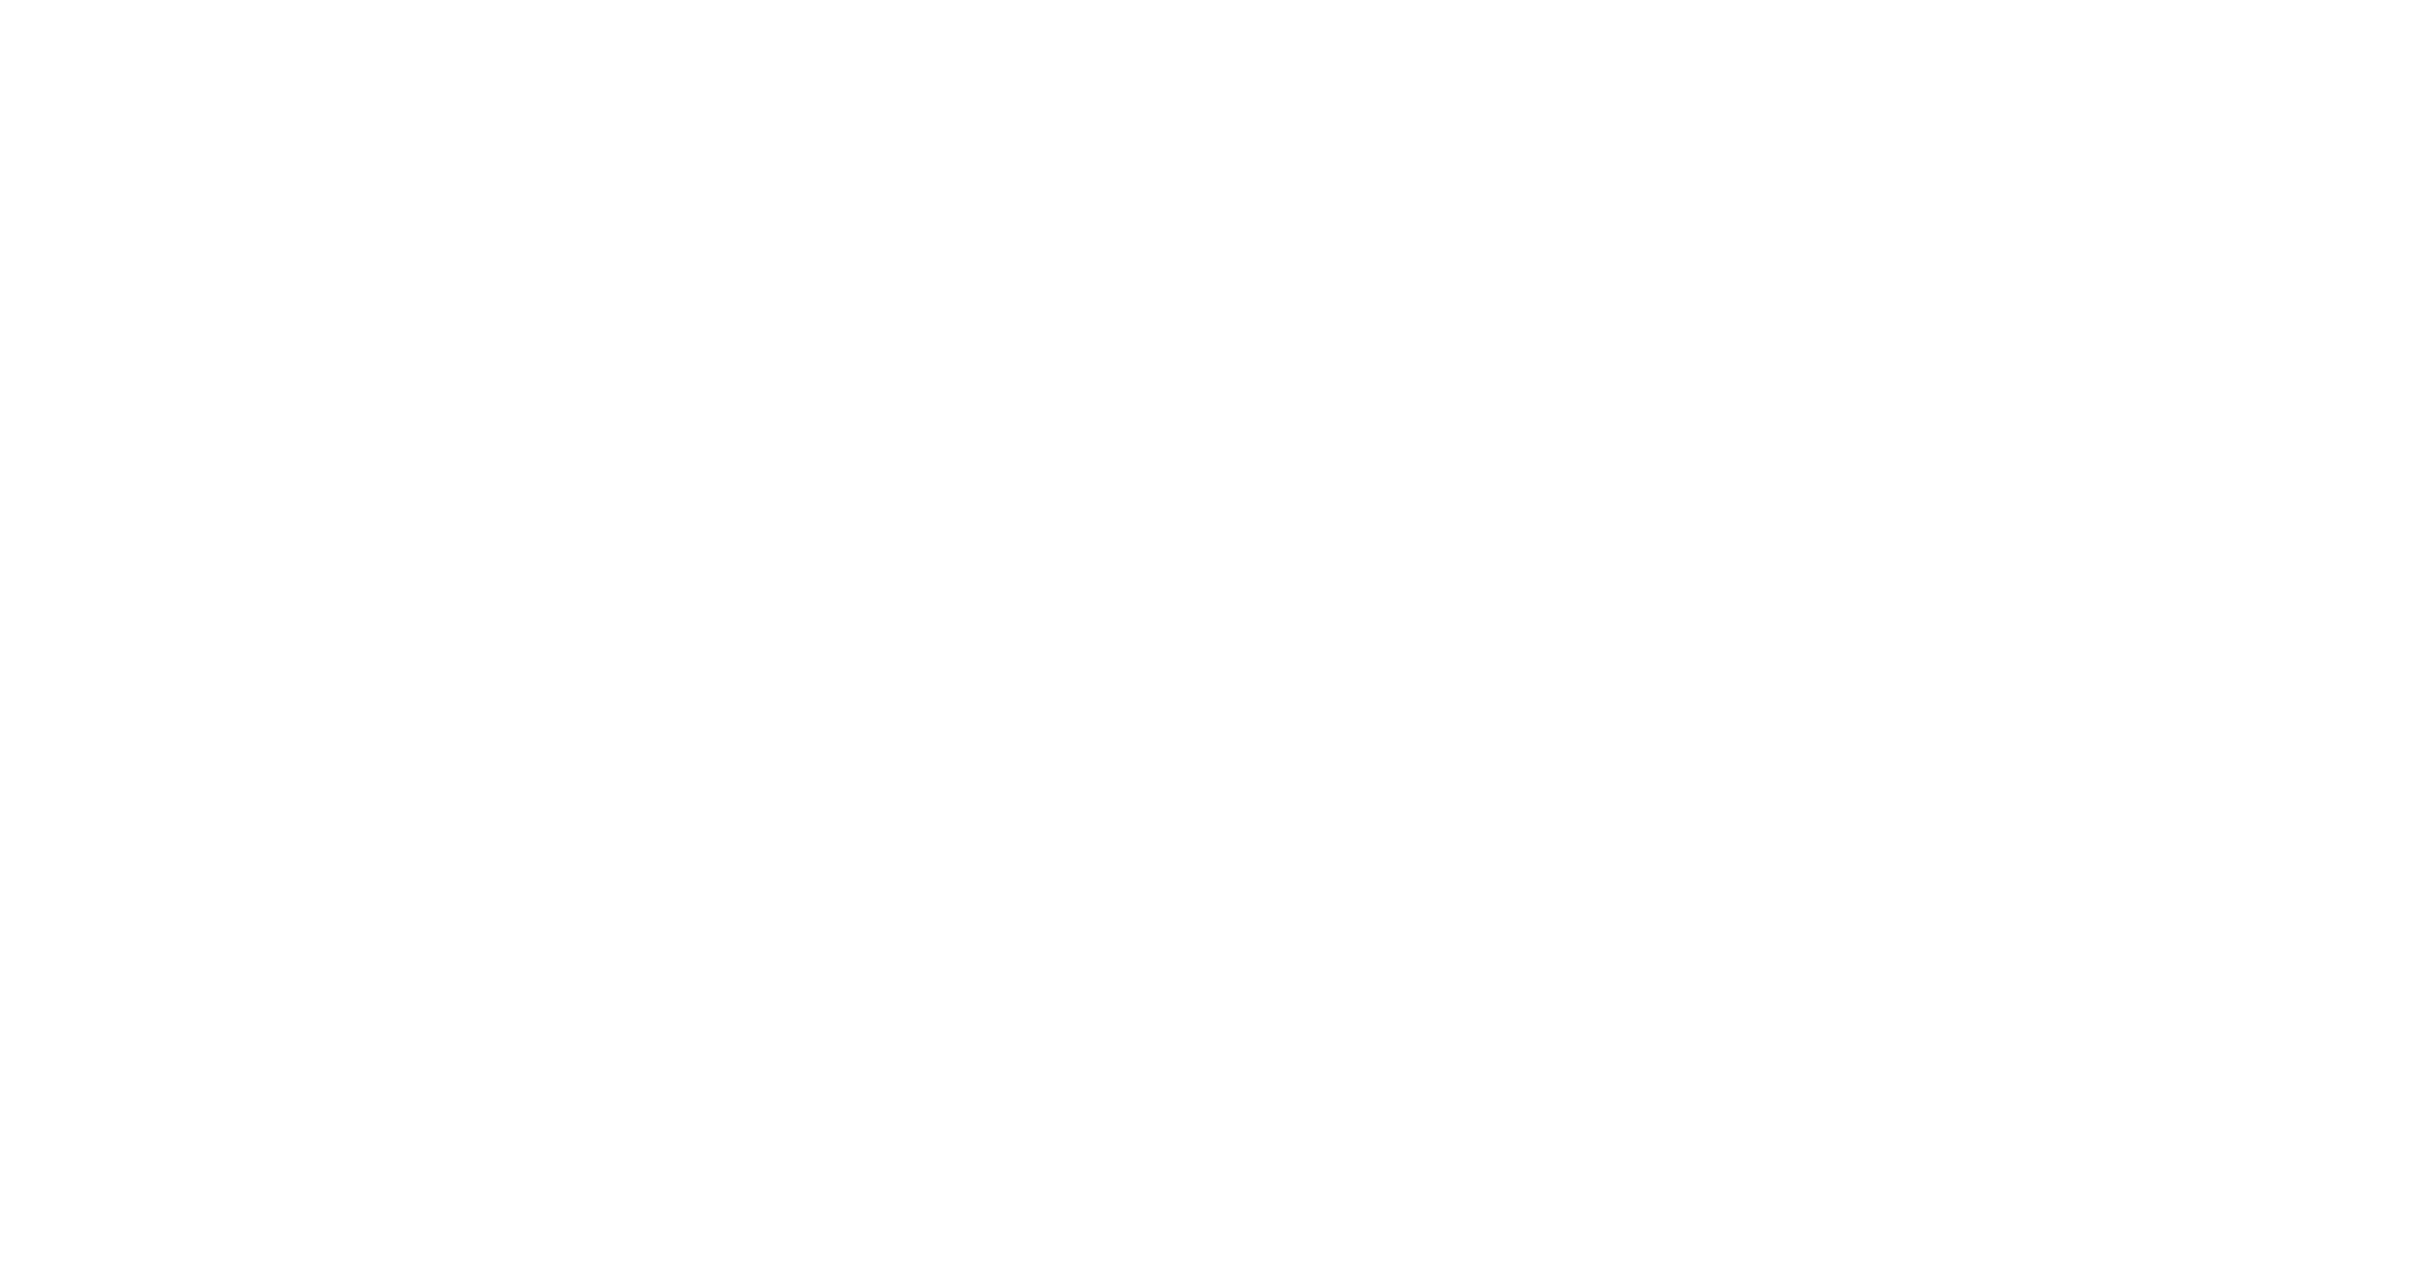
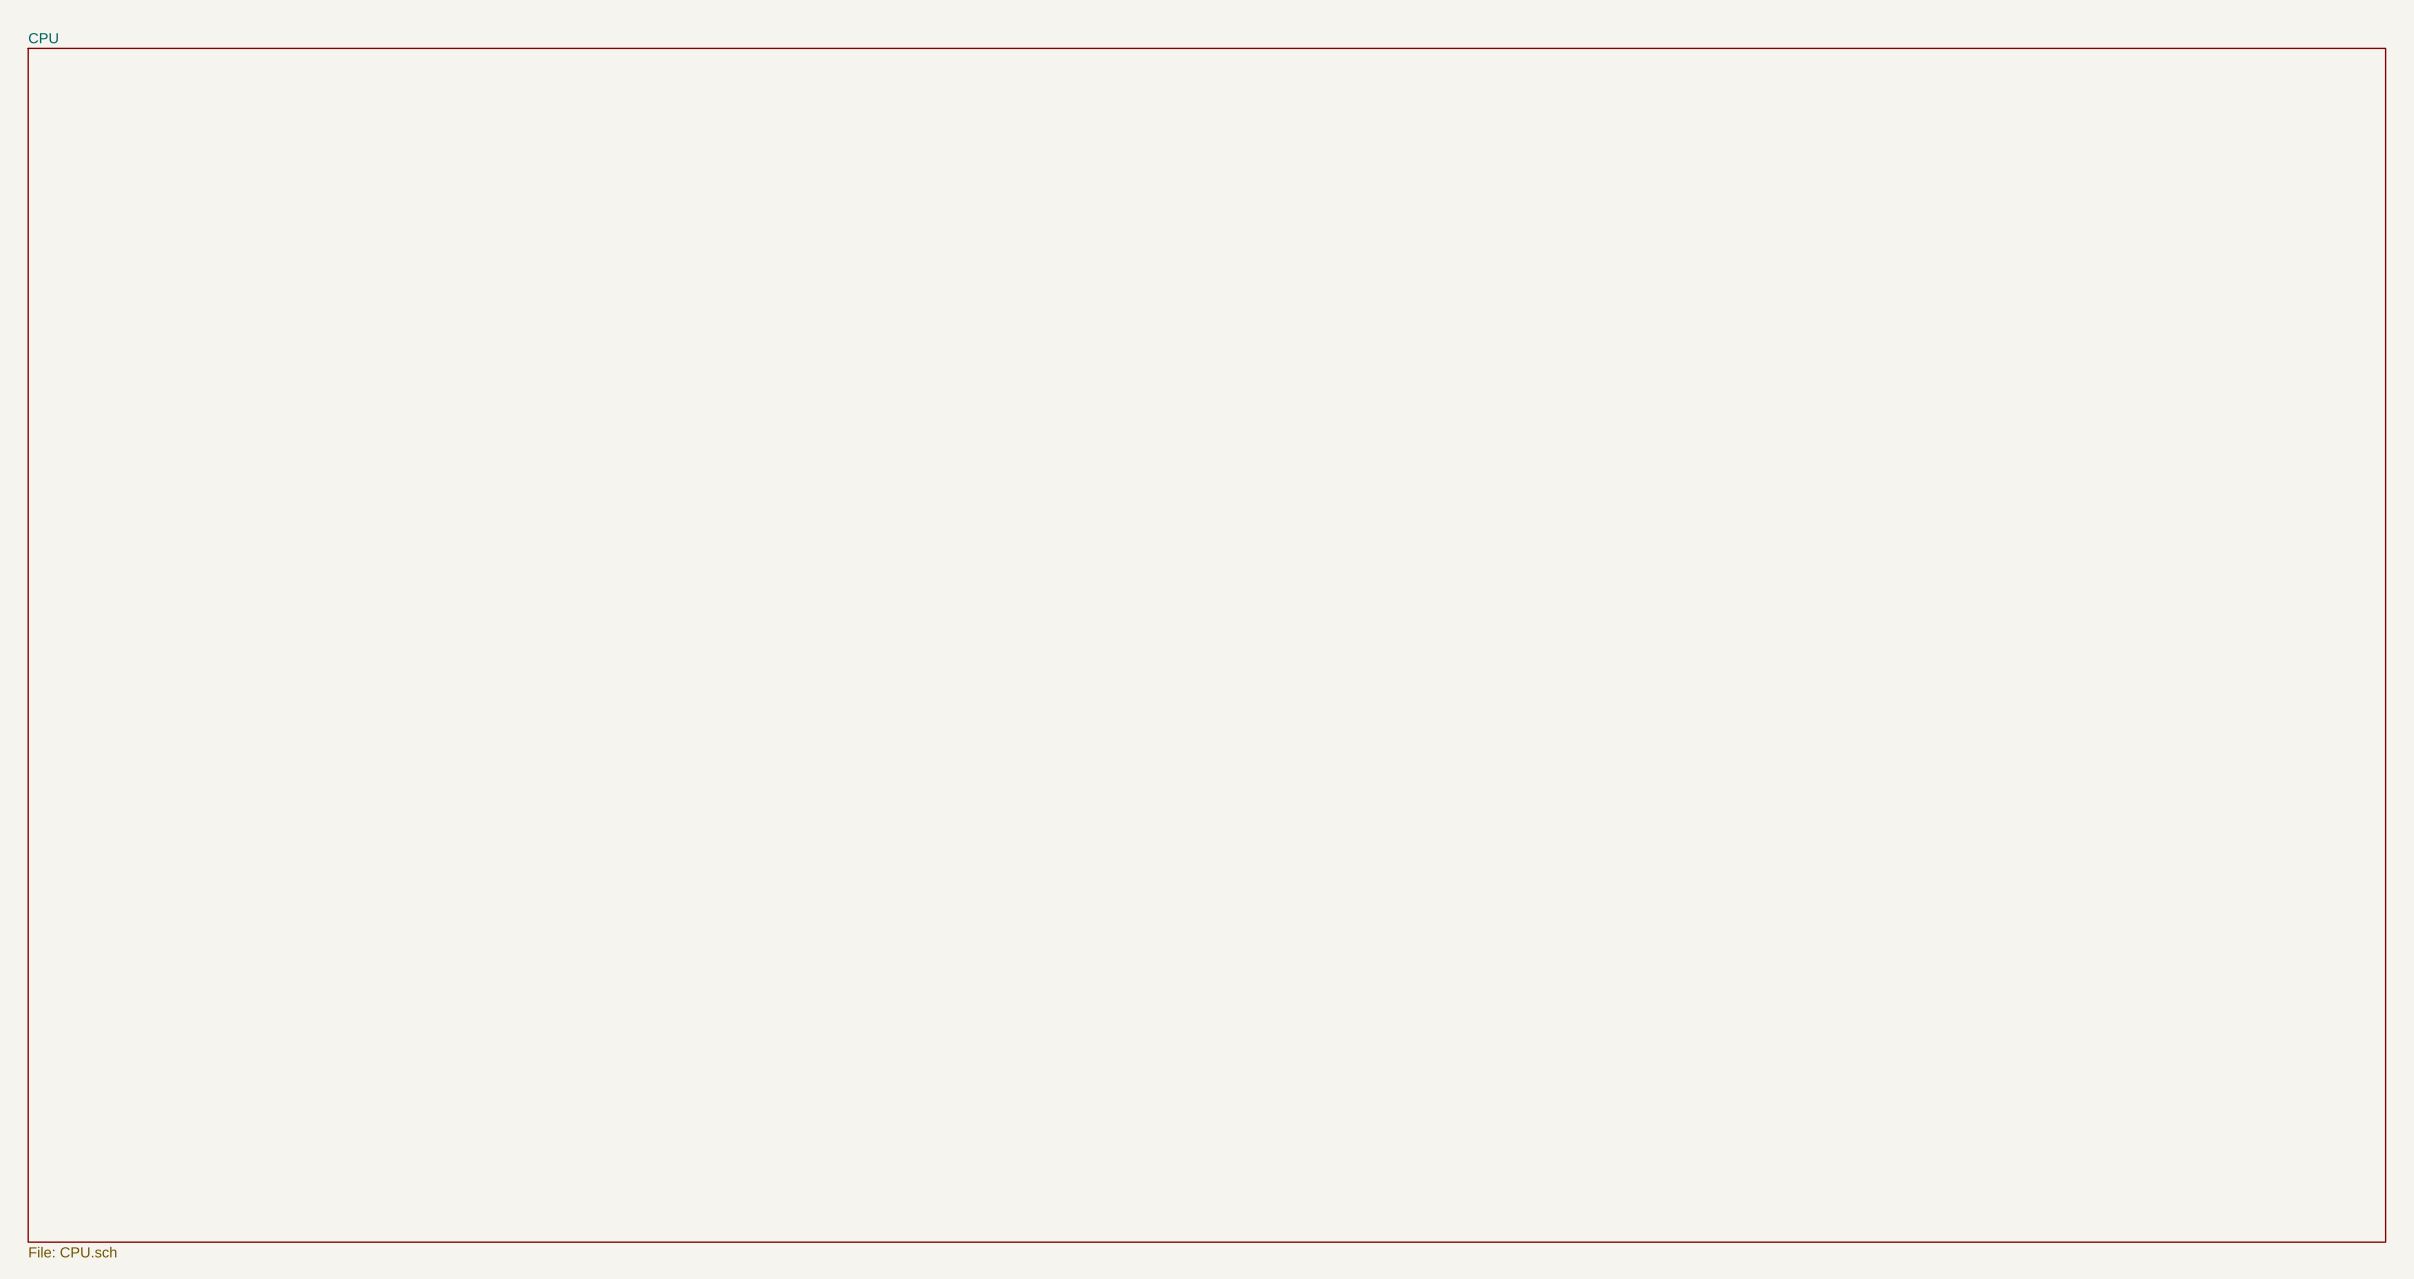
sheet CPU: none -> File: CPU.sch (1206, 645)

